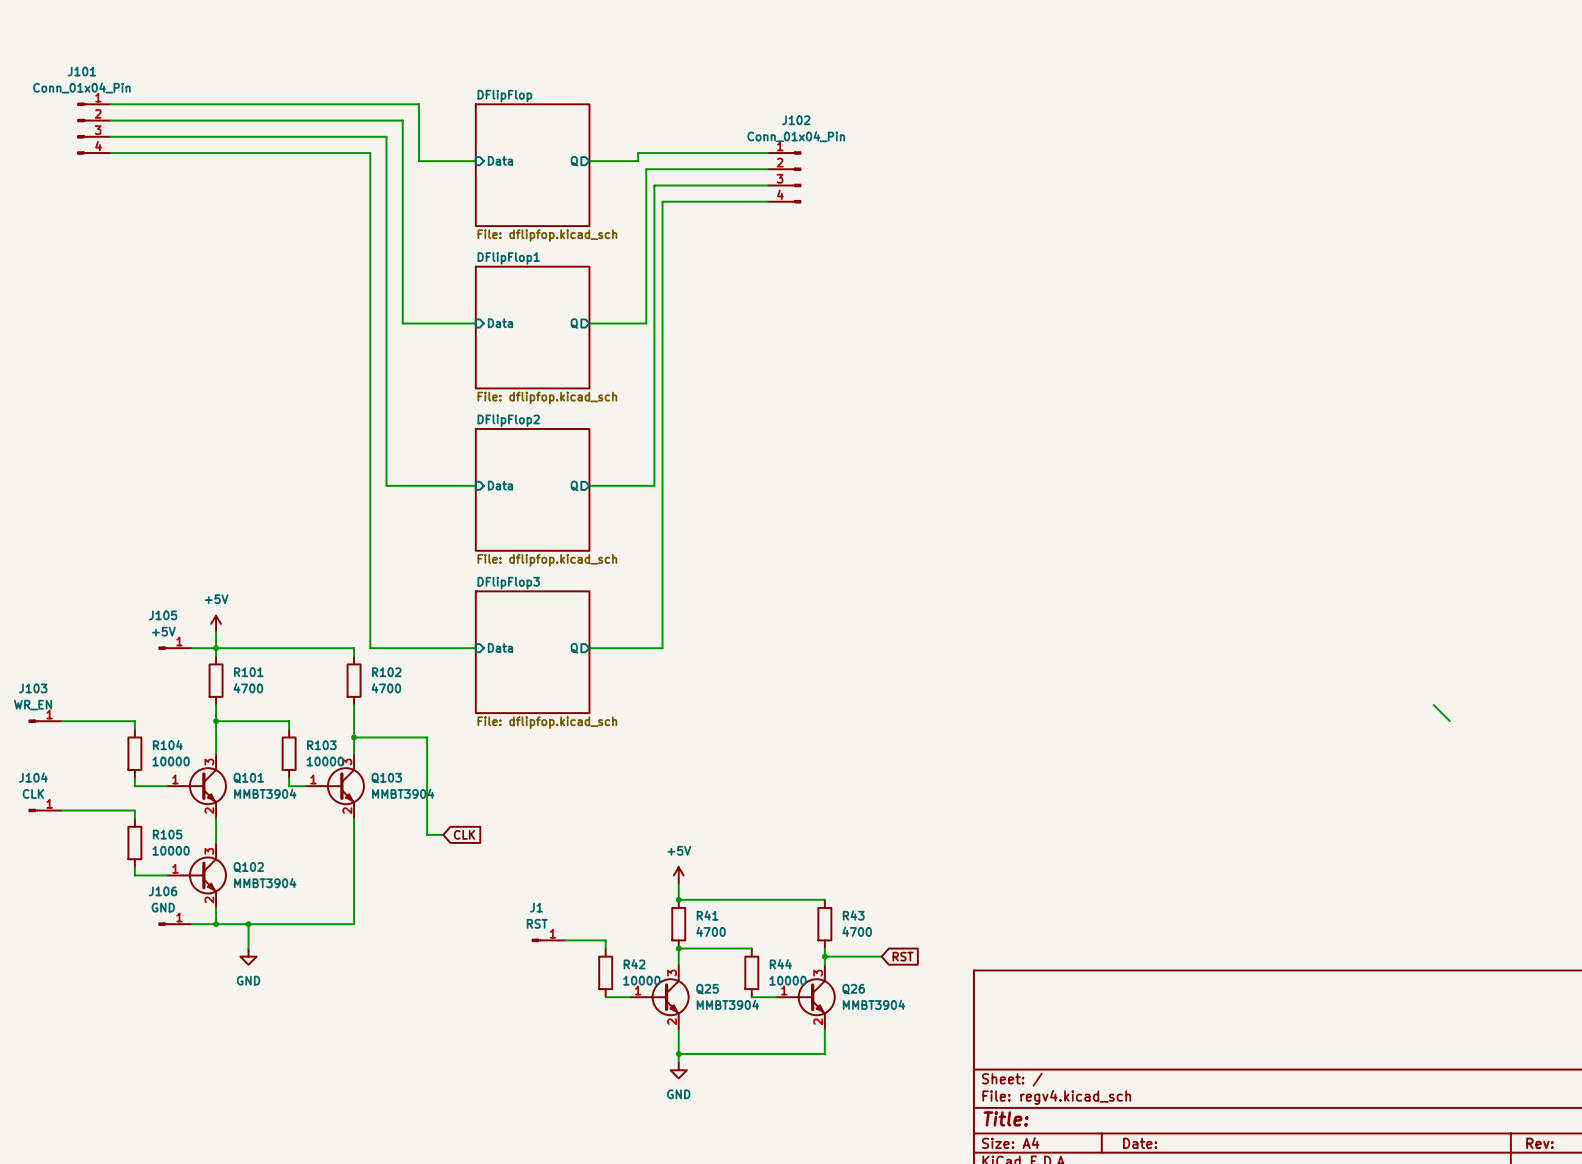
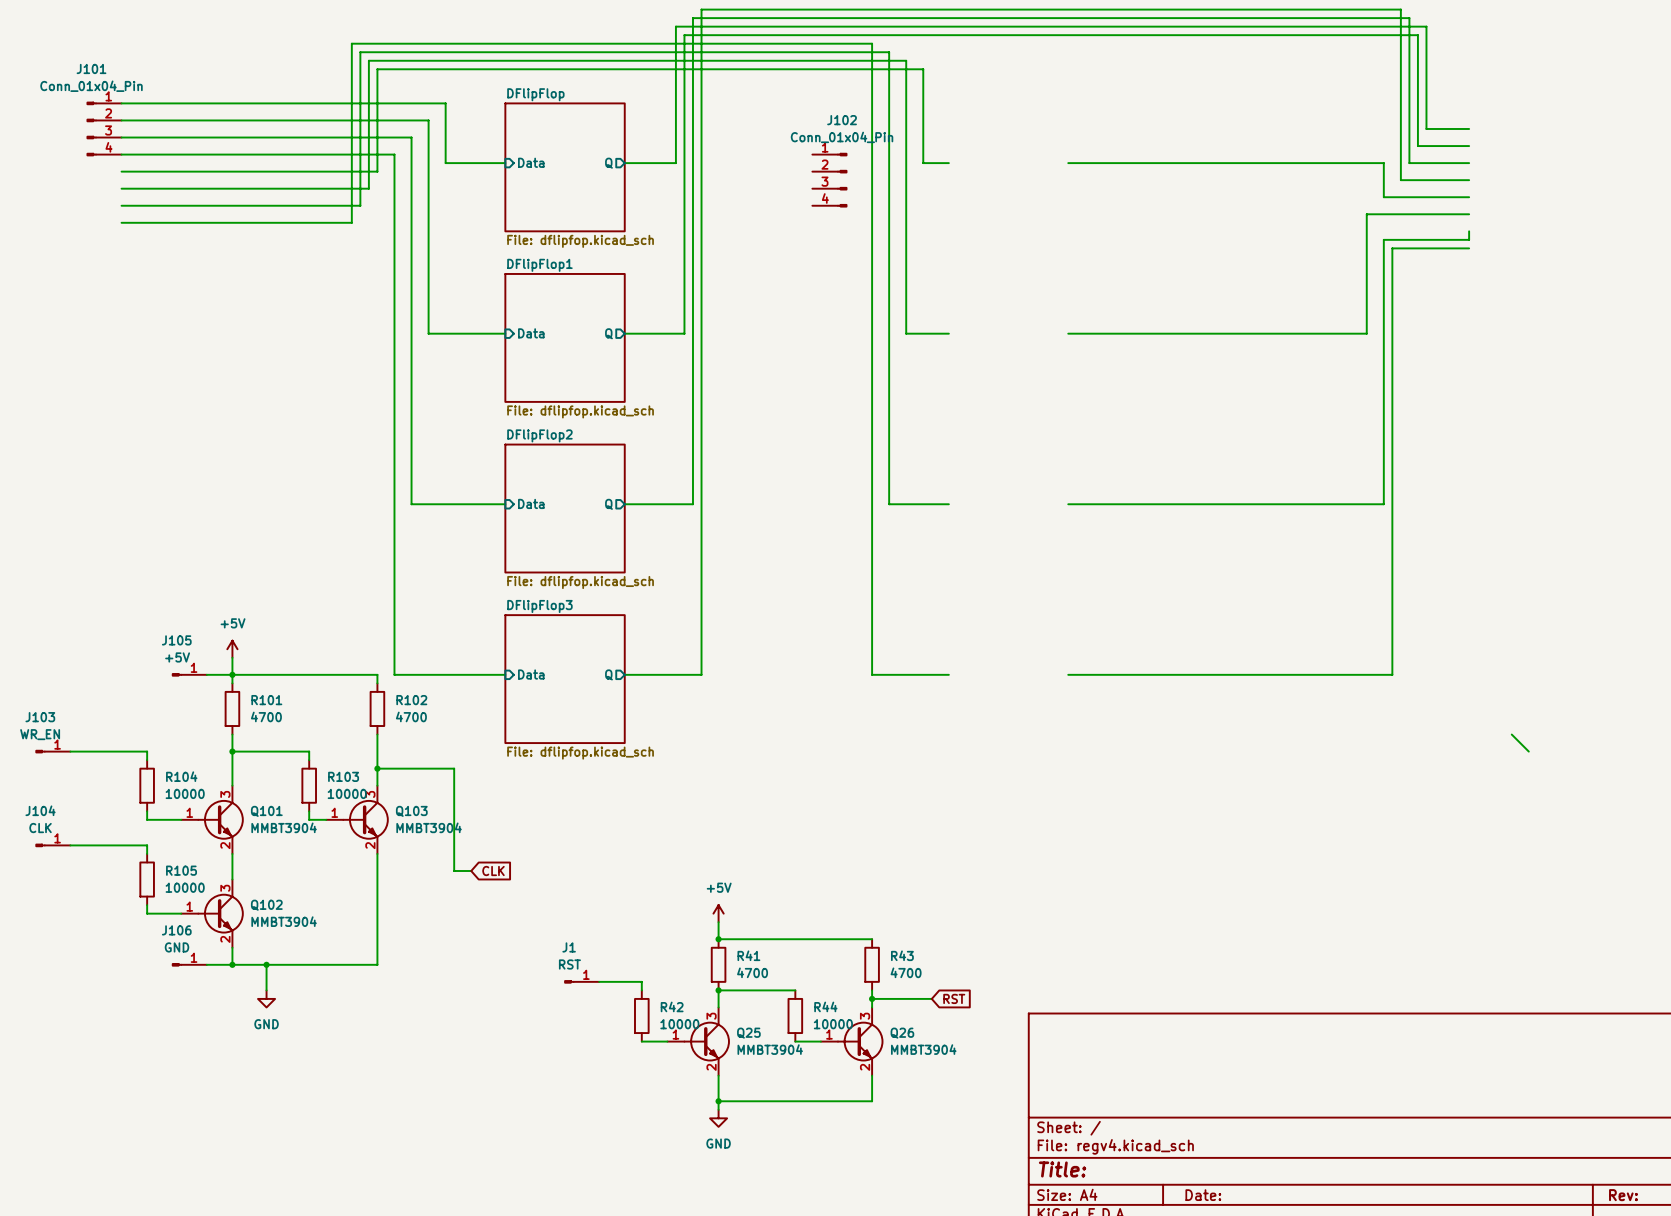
wire: (638, 153) (768, 153) -> (675, 154) (675, 26) (1426, 26) (1426, 128) (1469, 128)
wire: none -> (948, 163) (923, 163) (923, 69) (377, 69) (377, 171) (121, 171)
wire: none -> (1068, 163) (1383, 163) (1383, 197) (1469, 197)
wire: (646, 169) (768, 169) -> (684, 171) (684, 35) (1417, 35) (1417, 146) (1469, 146)
wire: none -> (121, 188) (368, 188) (368, 60) (906, 60) (906, 333) (948, 333)
wire: (654, 185) (768, 185) -> (692, 188) (692, 18) (1409, 18) (1409, 163) (1469, 163)
wire: none -> (121, 205) (360, 205) (360, 52) (889, 52) (889, 504) (948, 504)
wire: (662, 201) (768, 201) -> (701, 205) (701, 9) (1400, 9) (1400, 180) (1469, 180)
wire: none -> (1469, 214) (1366, 214) (1366, 333) (1068, 333)
wire: none -> (121, 222) (351, 222) (351, 43) (872, 43) (872, 674) (948, 674)
wire: none -> (1469, 231) (1469, 239) (1383, 239) (1383, 504) (1068, 504)
wire: none -> (1469, 248) (1392, 248) (1392, 674) (1068, 674)

